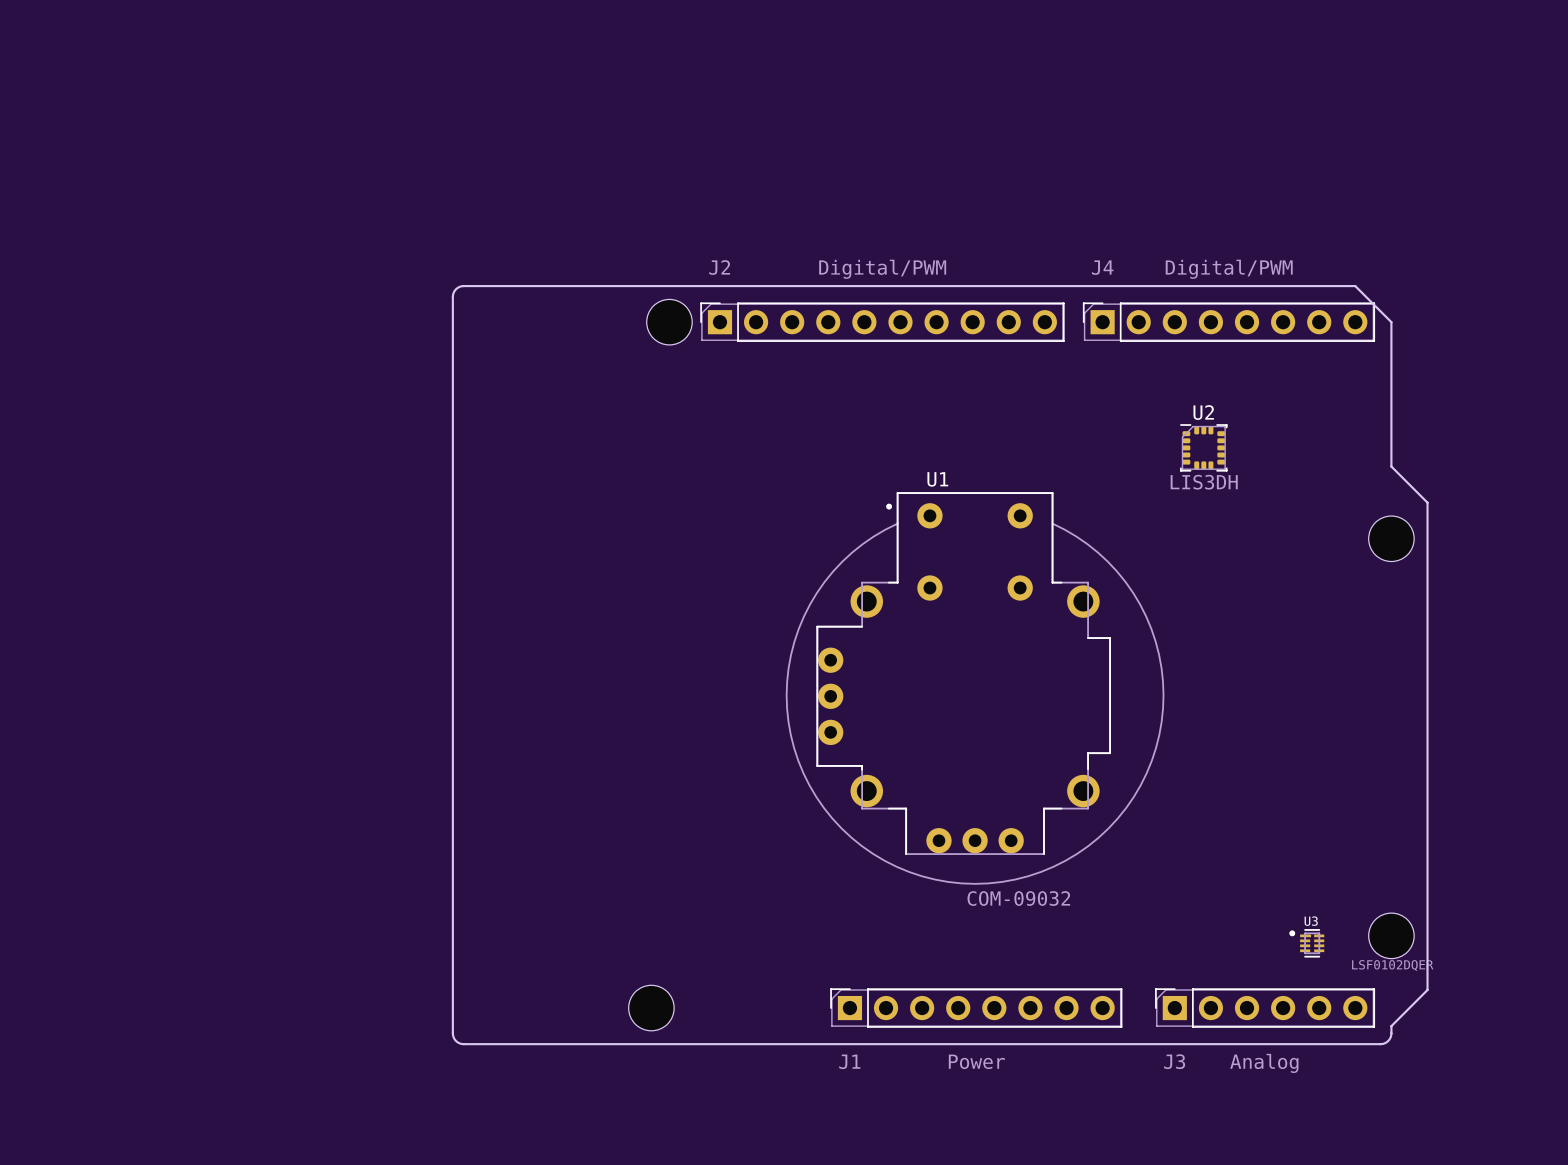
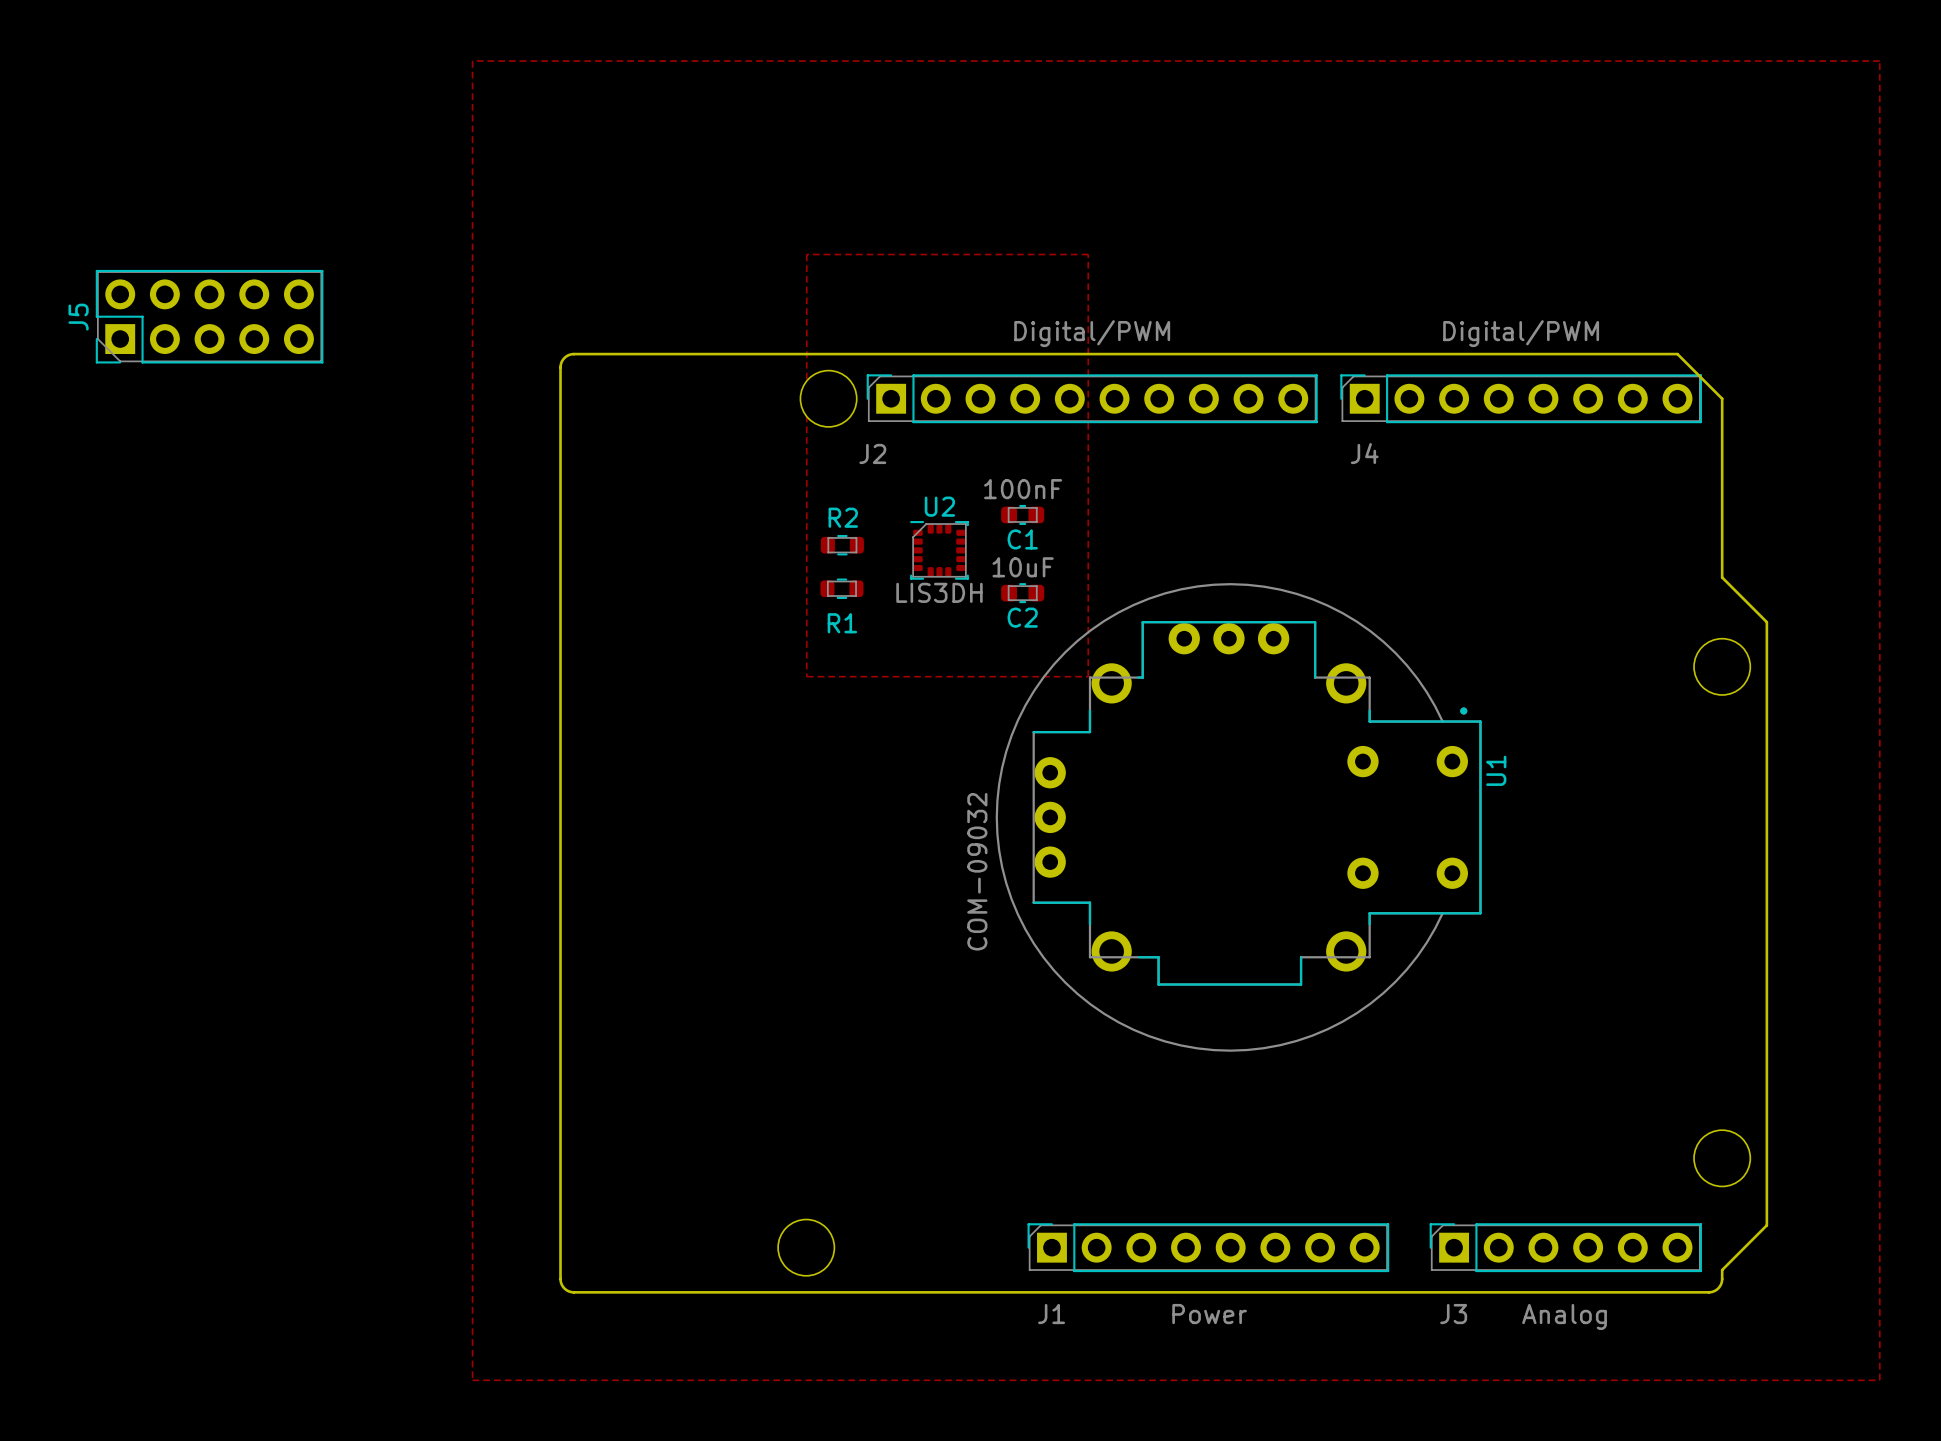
zone outline: none -> (472, 61) (472, 1380) (1879, 1380) (1879, 61) (472, 61)
zone outline: none -> (806, 254) (1088, 254) (1088, 676) (806, 676) (806, 254)
J5: none -> (209, 316)
J2 name position: J2 (719, 267) -> J2 (872, 453)
J4 name position: J4 (1102, 267) -> J4 (1364, 453)
C1: none -> 100nF (1022, 514)
R2: none -> (842, 545)
U2 position: (1203, 447) -> (939, 550)
R1: none -> (841, 588)
C2: none -> 10uF (1022, 593)
U1 rotation: 0° (975, 688) -> 90° clockwise (1238, 817)
U3: LSF0102DQER (1306, 943) -> none

